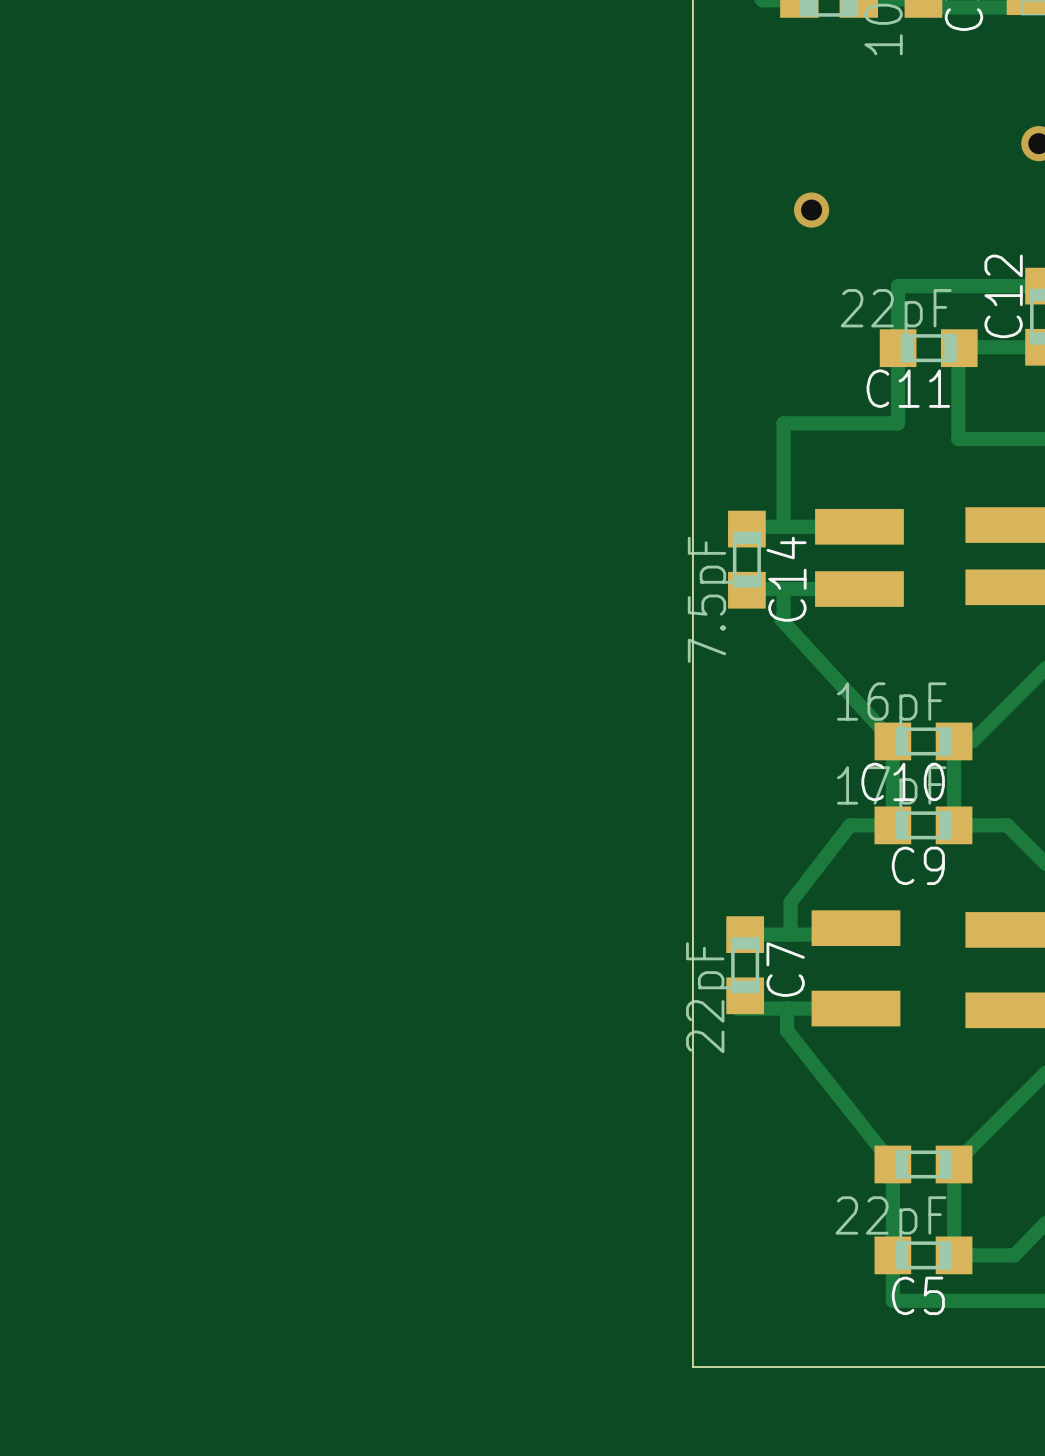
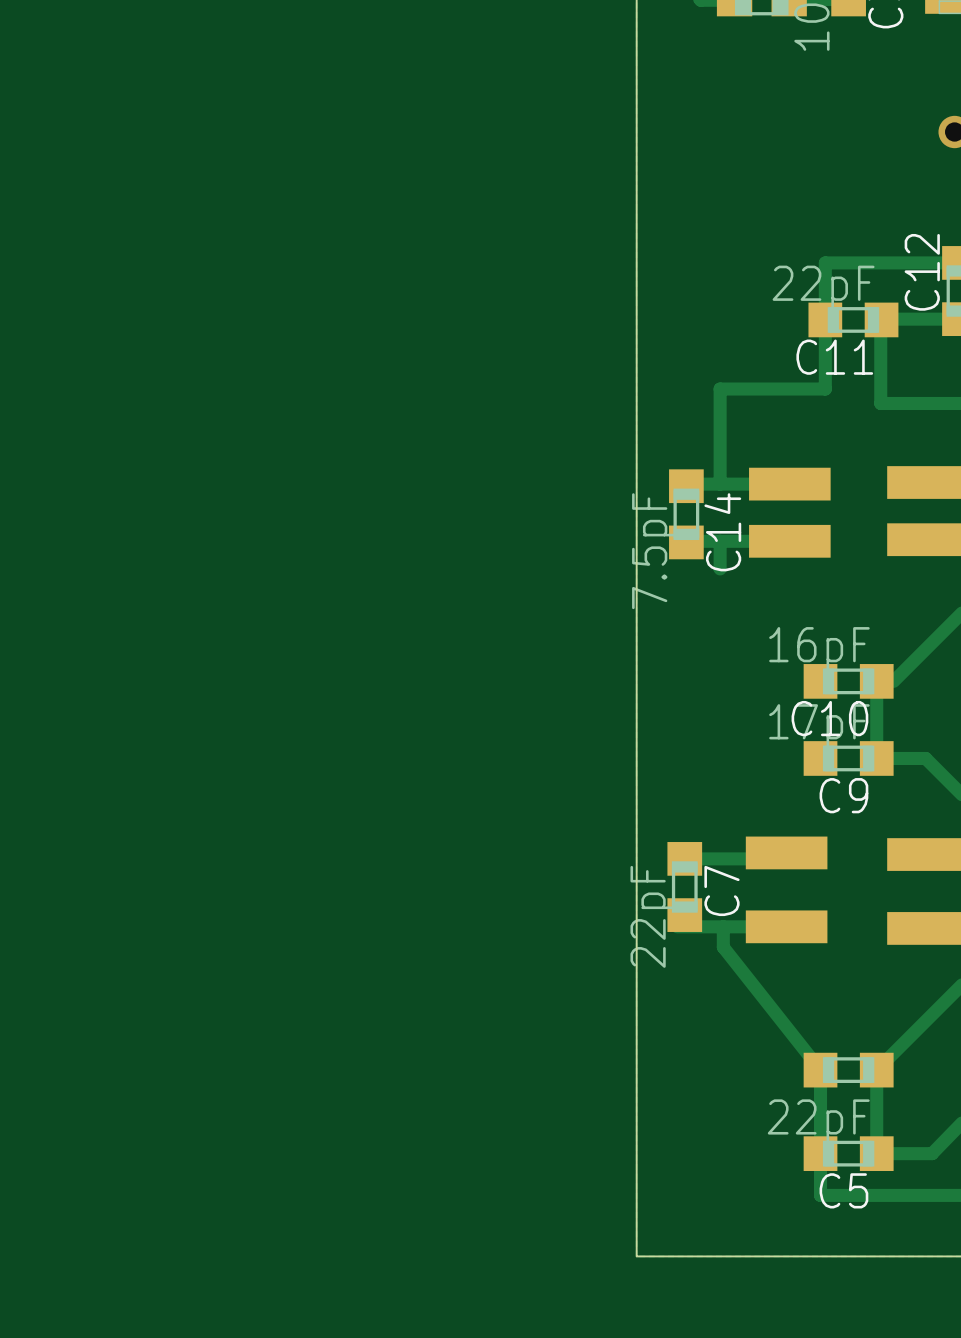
track: (931, 7) (1031, 7) -> none
via: (811, 210) -> none
track: (781, 619) (892, 741) (892, 825) (850, 825) (790, 902) (790, 934) -> none

